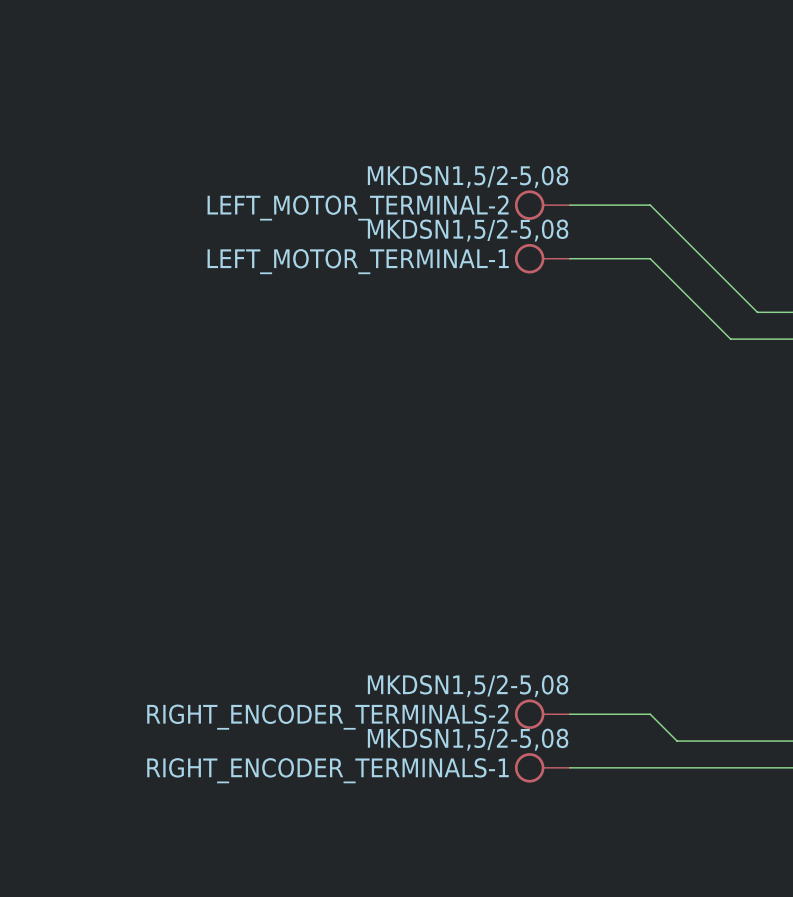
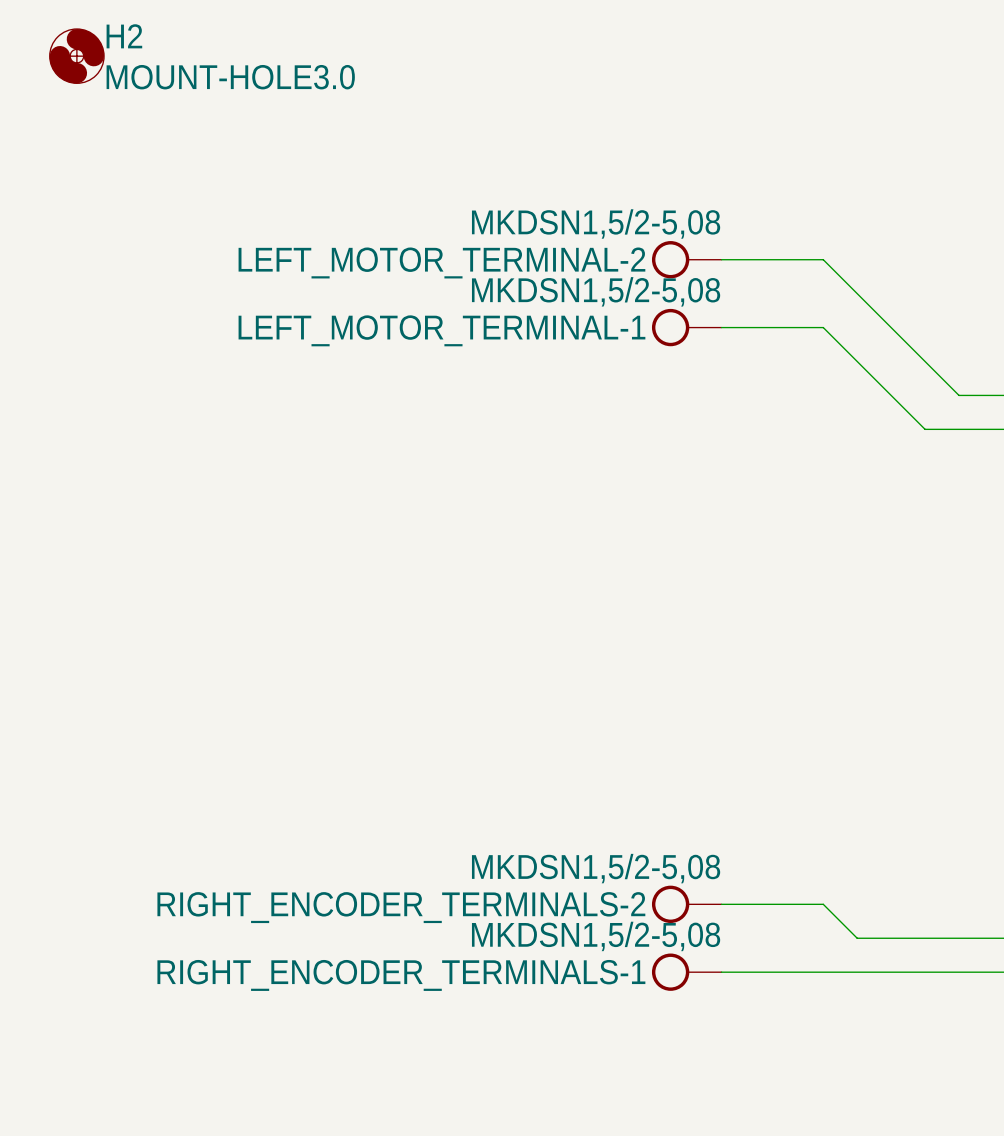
H2: none -> MOUNT-HOLE3.0 (76, 56)

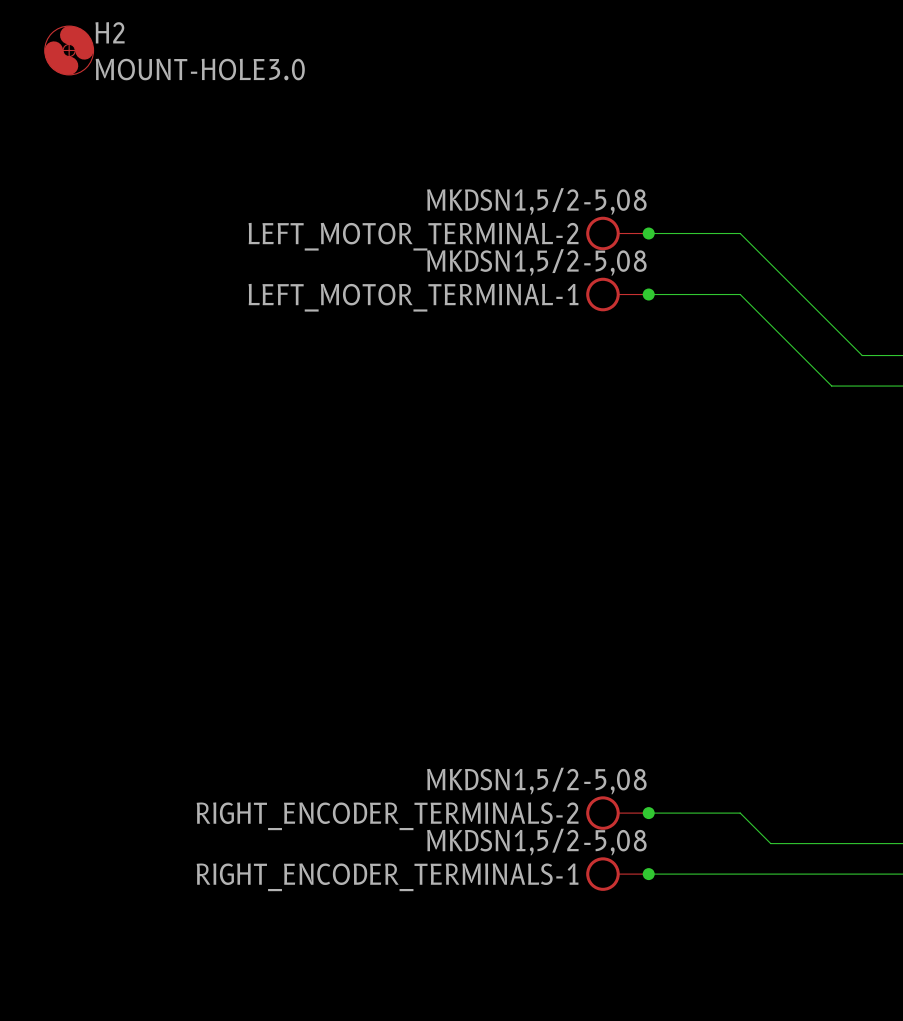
junction: none -> (648, 233)
junction: none -> (648, 294)
junction: none -> (648, 813)
junction: none -> (648, 874)

